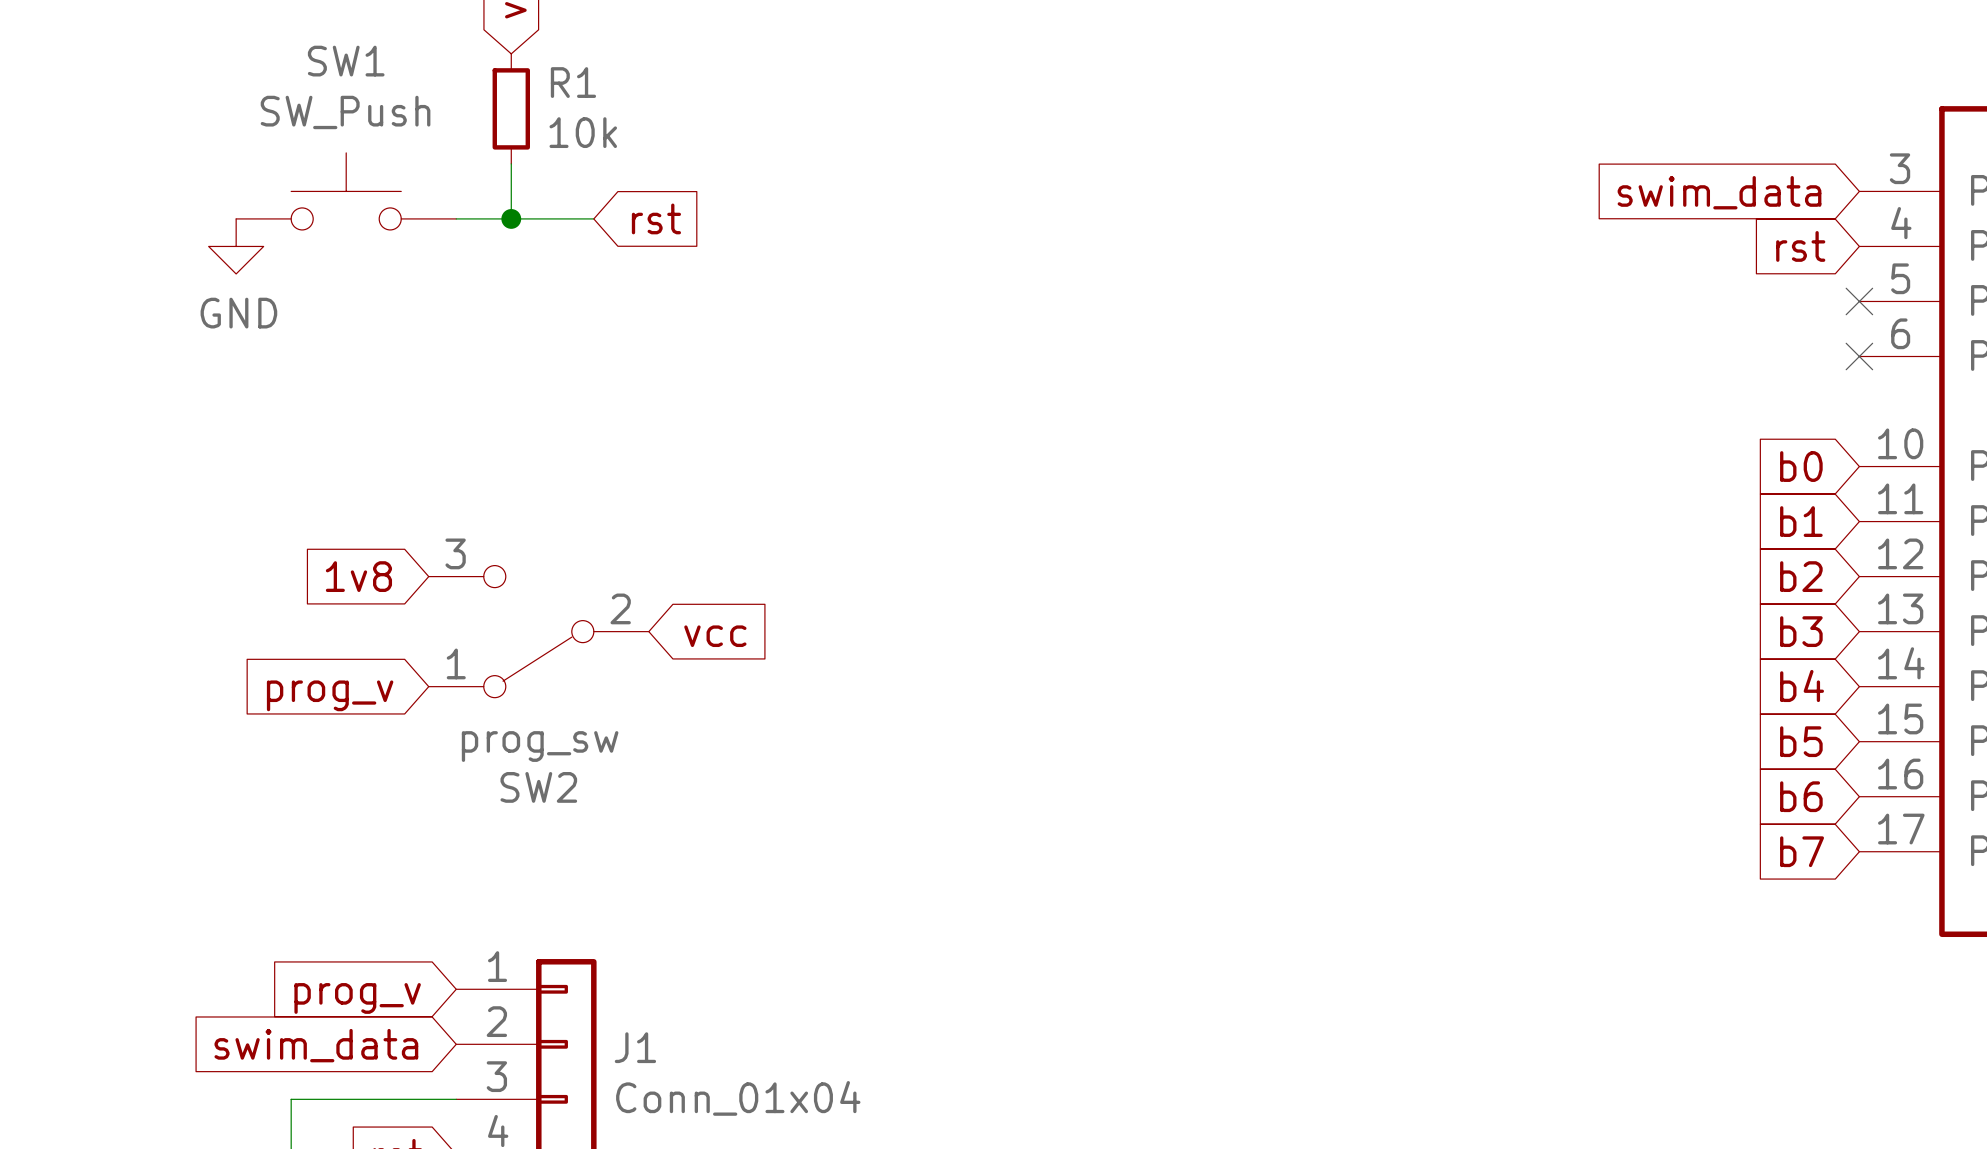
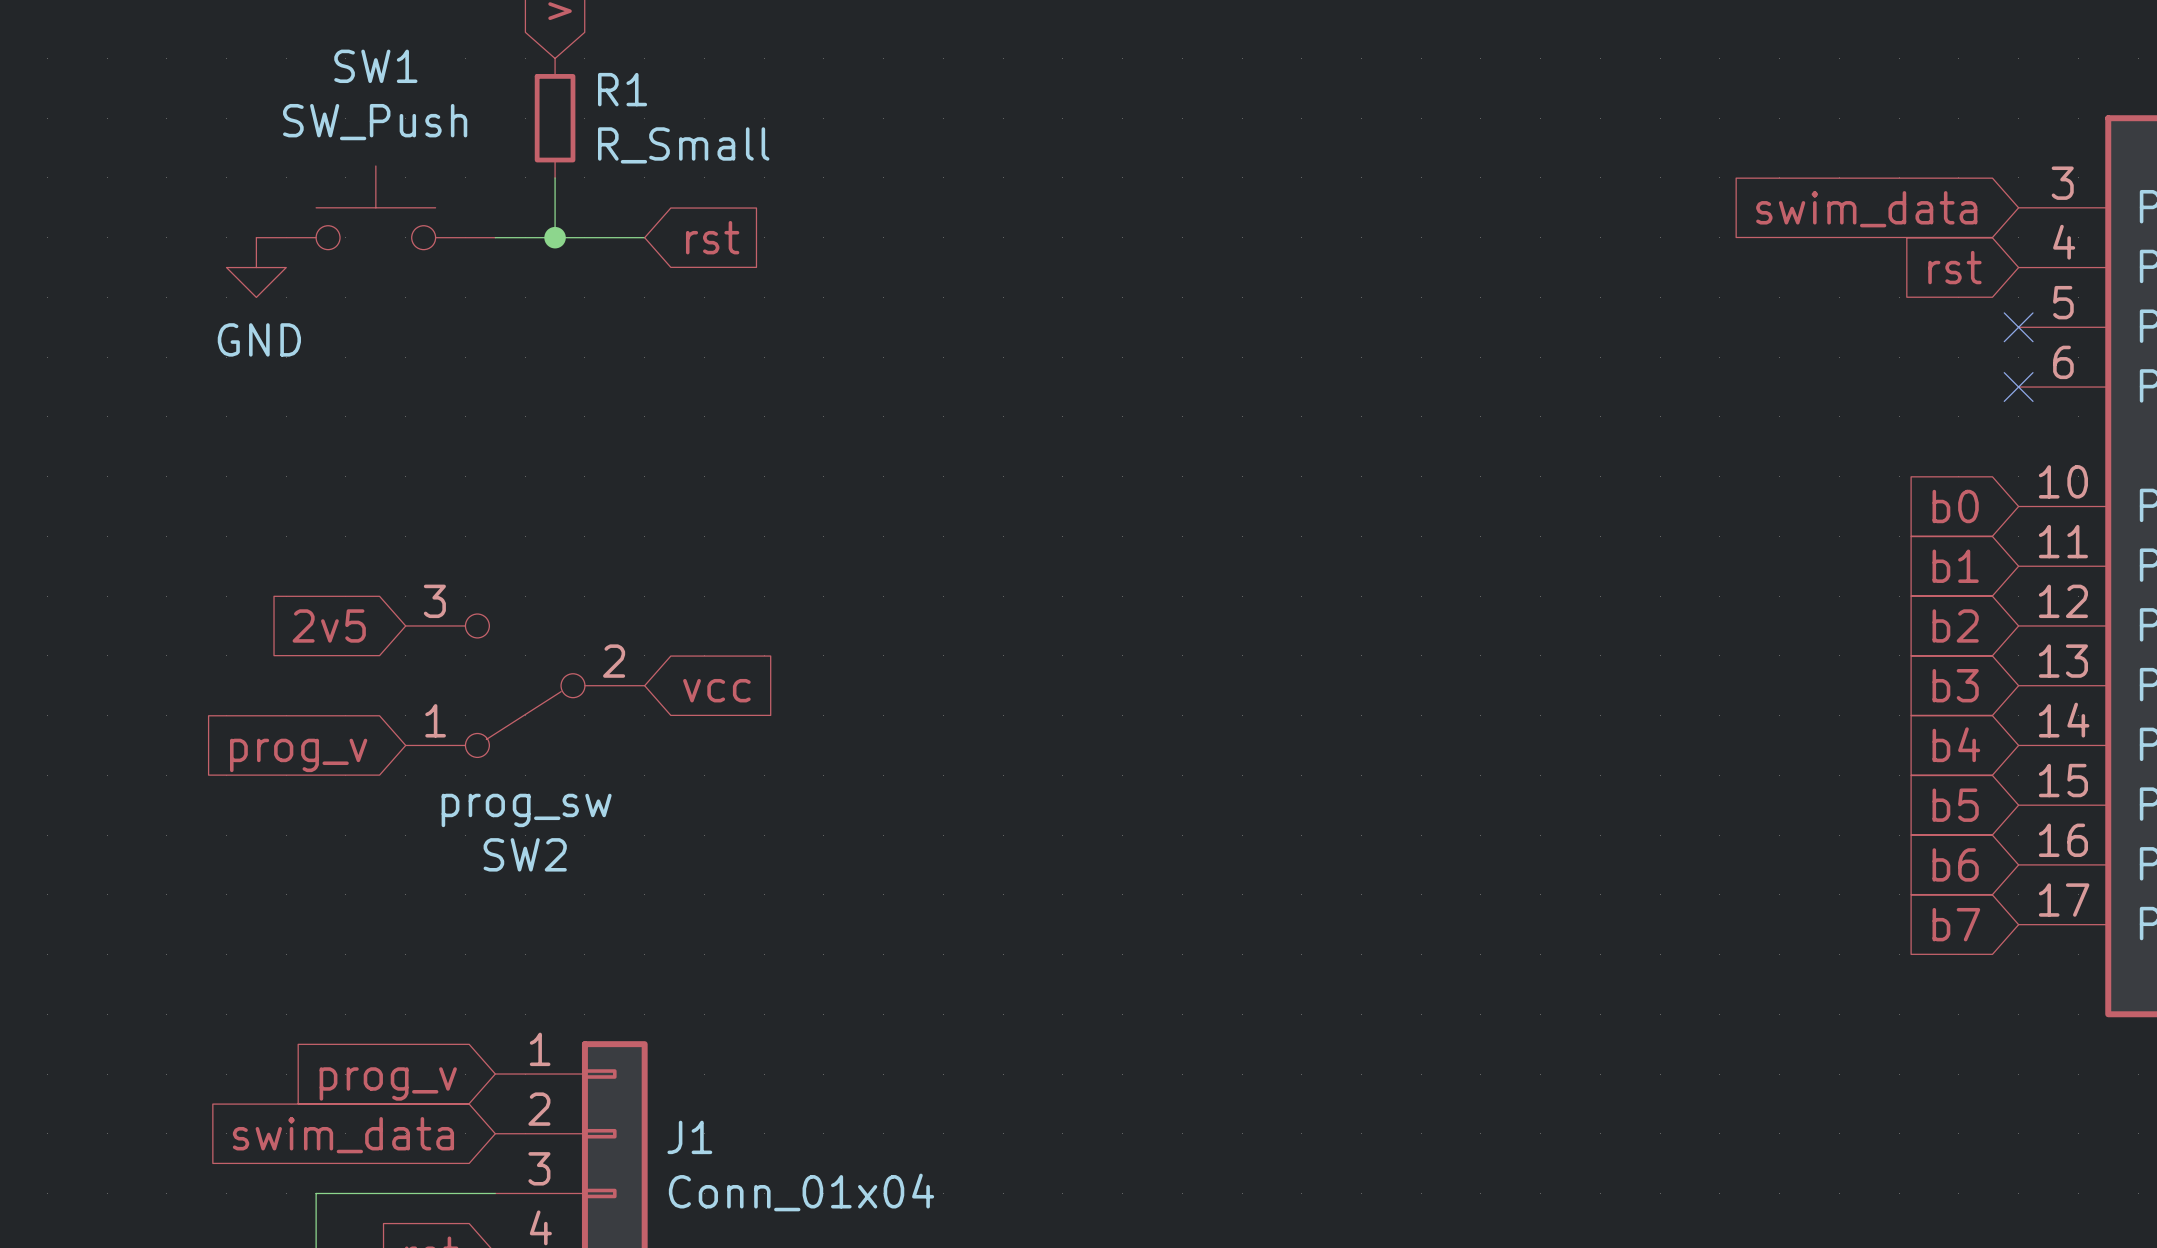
R1 value: 10k (583, 132) -> R_Small (683, 145)
global label: none -> 2v5 (329, 625)
global label: 1v8 (358, 576) -> none
SW2 position: (538, 631) -> (525, 685)
global label position: vcc (715, 636) -> vcc (716, 690)
global label position: prog_v (330, 695) -> prog_v (298, 755)

